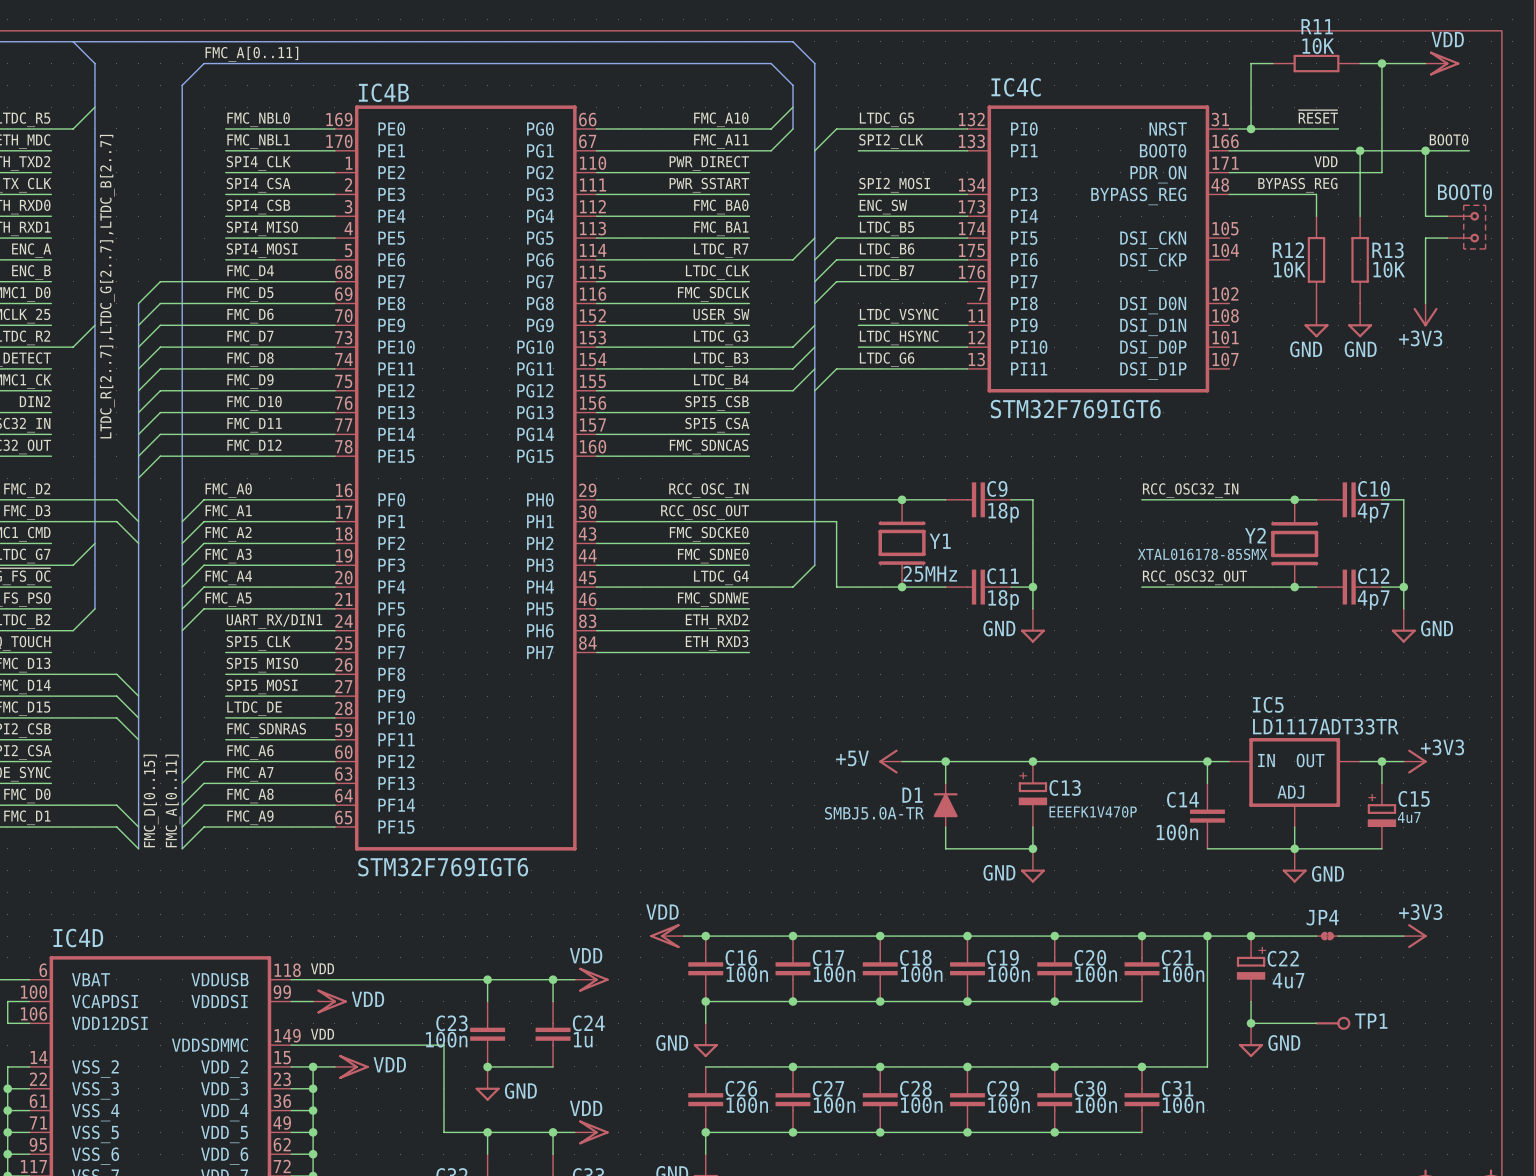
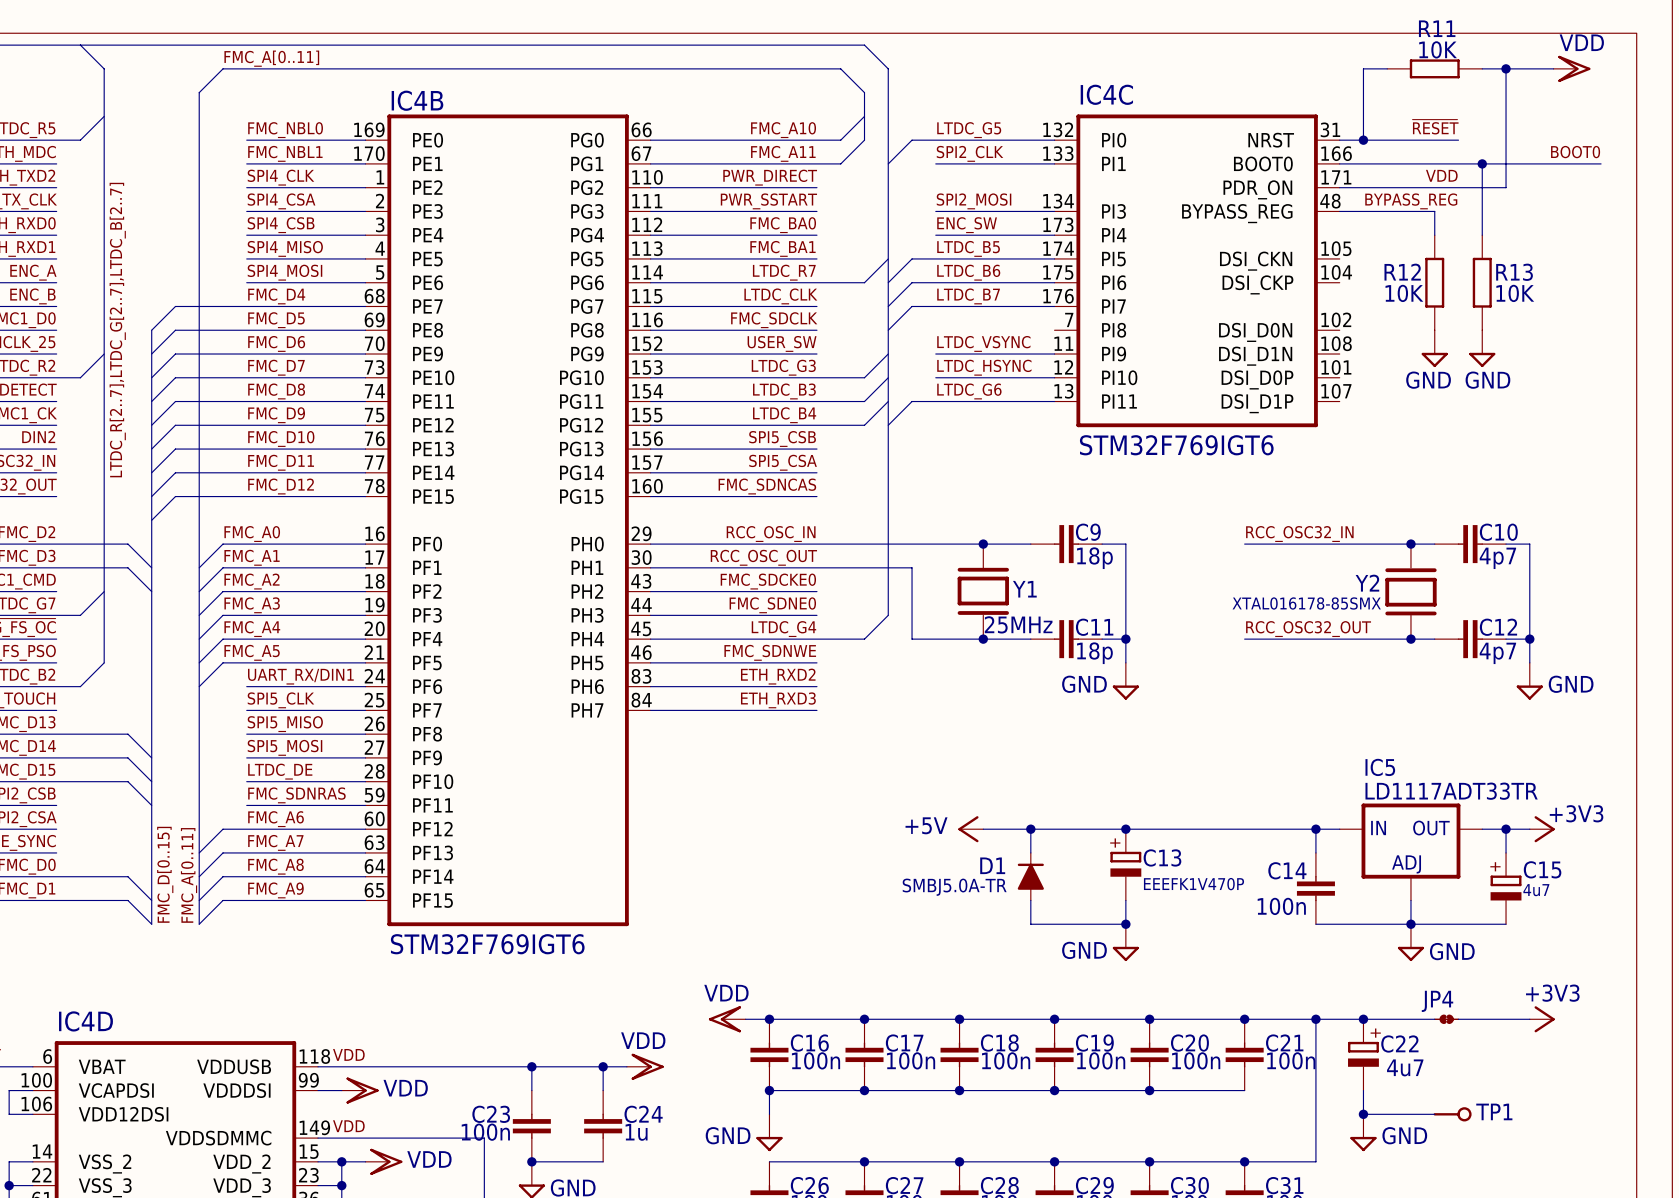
wire: (1425, 150) (1425, 216) (1447, 216) -> none
junction: (1425, 150) -> none
BOOT0: (1466, 227) -> none
wire: (1447, 238) (1425, 238) (1425, 303) -> none
power symbol: +3V3 (1425, 314) -> none

